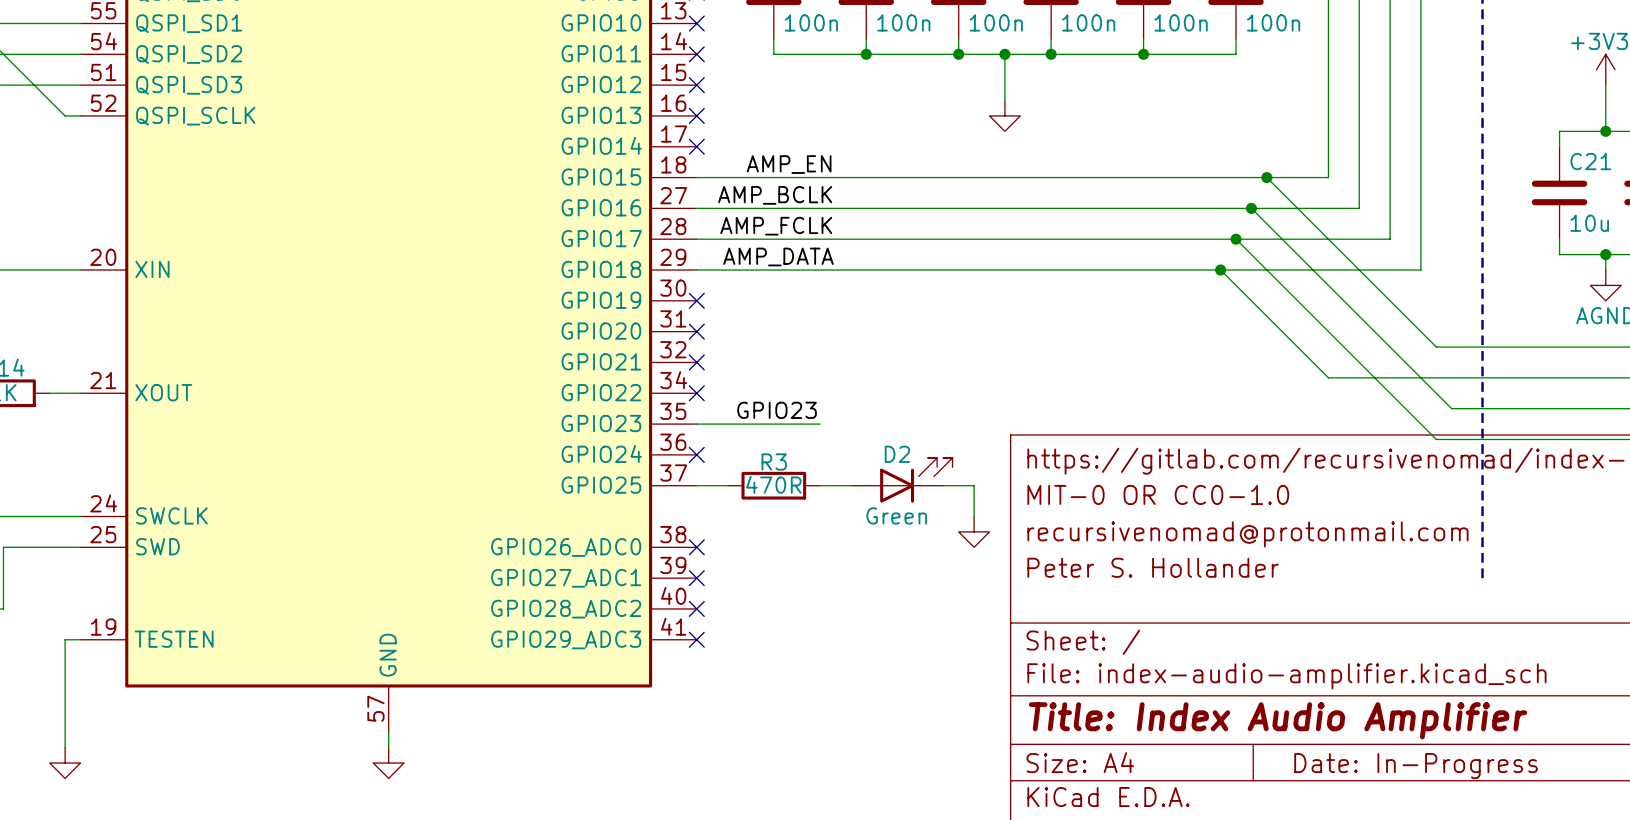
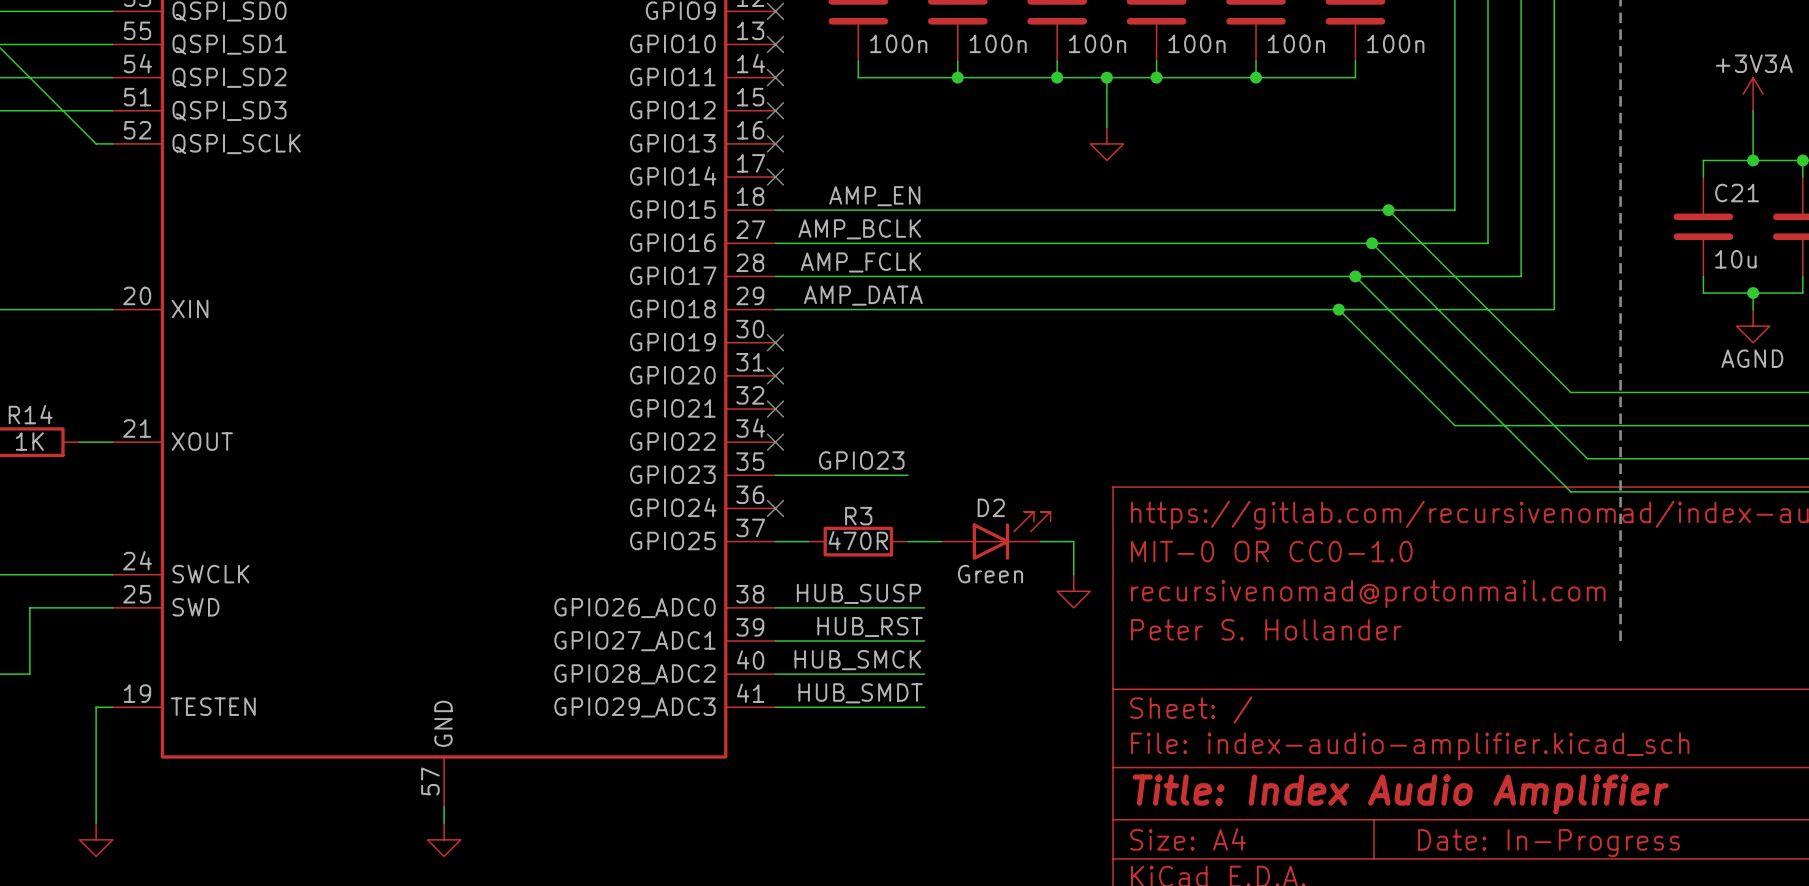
label: none -> HUB_SUSP (859, 593)
wire: none -> (775, 607) (924, 607)
no-connect mark: (696, 547) -> none
label: none -> HUB_RST (870, 627)
wire: none -> (775, 641) (924, 641)
no-connect mark: (696, 578) -> none
label: none -> HUB_SMCK (857, 660)
wire: none -> (775, 674) (924, 674)
no-connect mark: (696, 608) -> none
label: none -> HUB_SMDT (860, 693)
wire: none -> (775, 707) (924, 707)
no-connect mark: (696, 639) -> none

